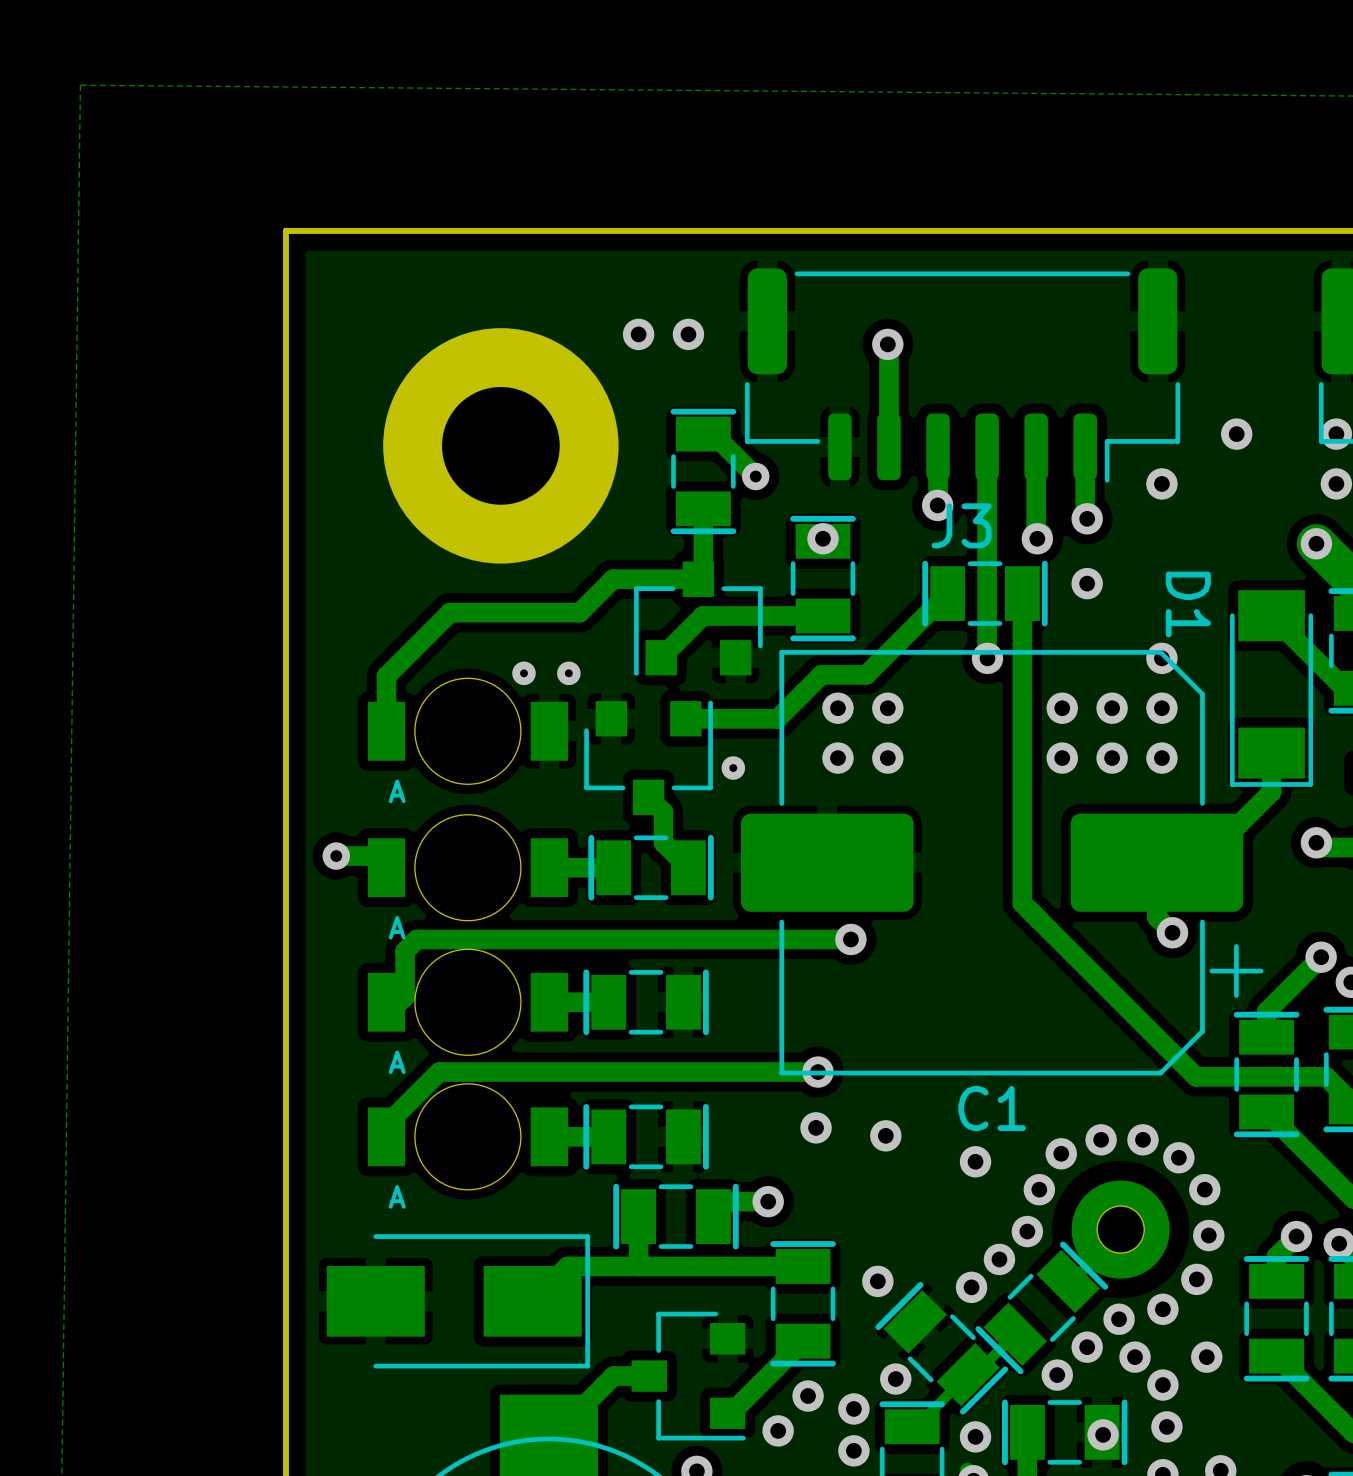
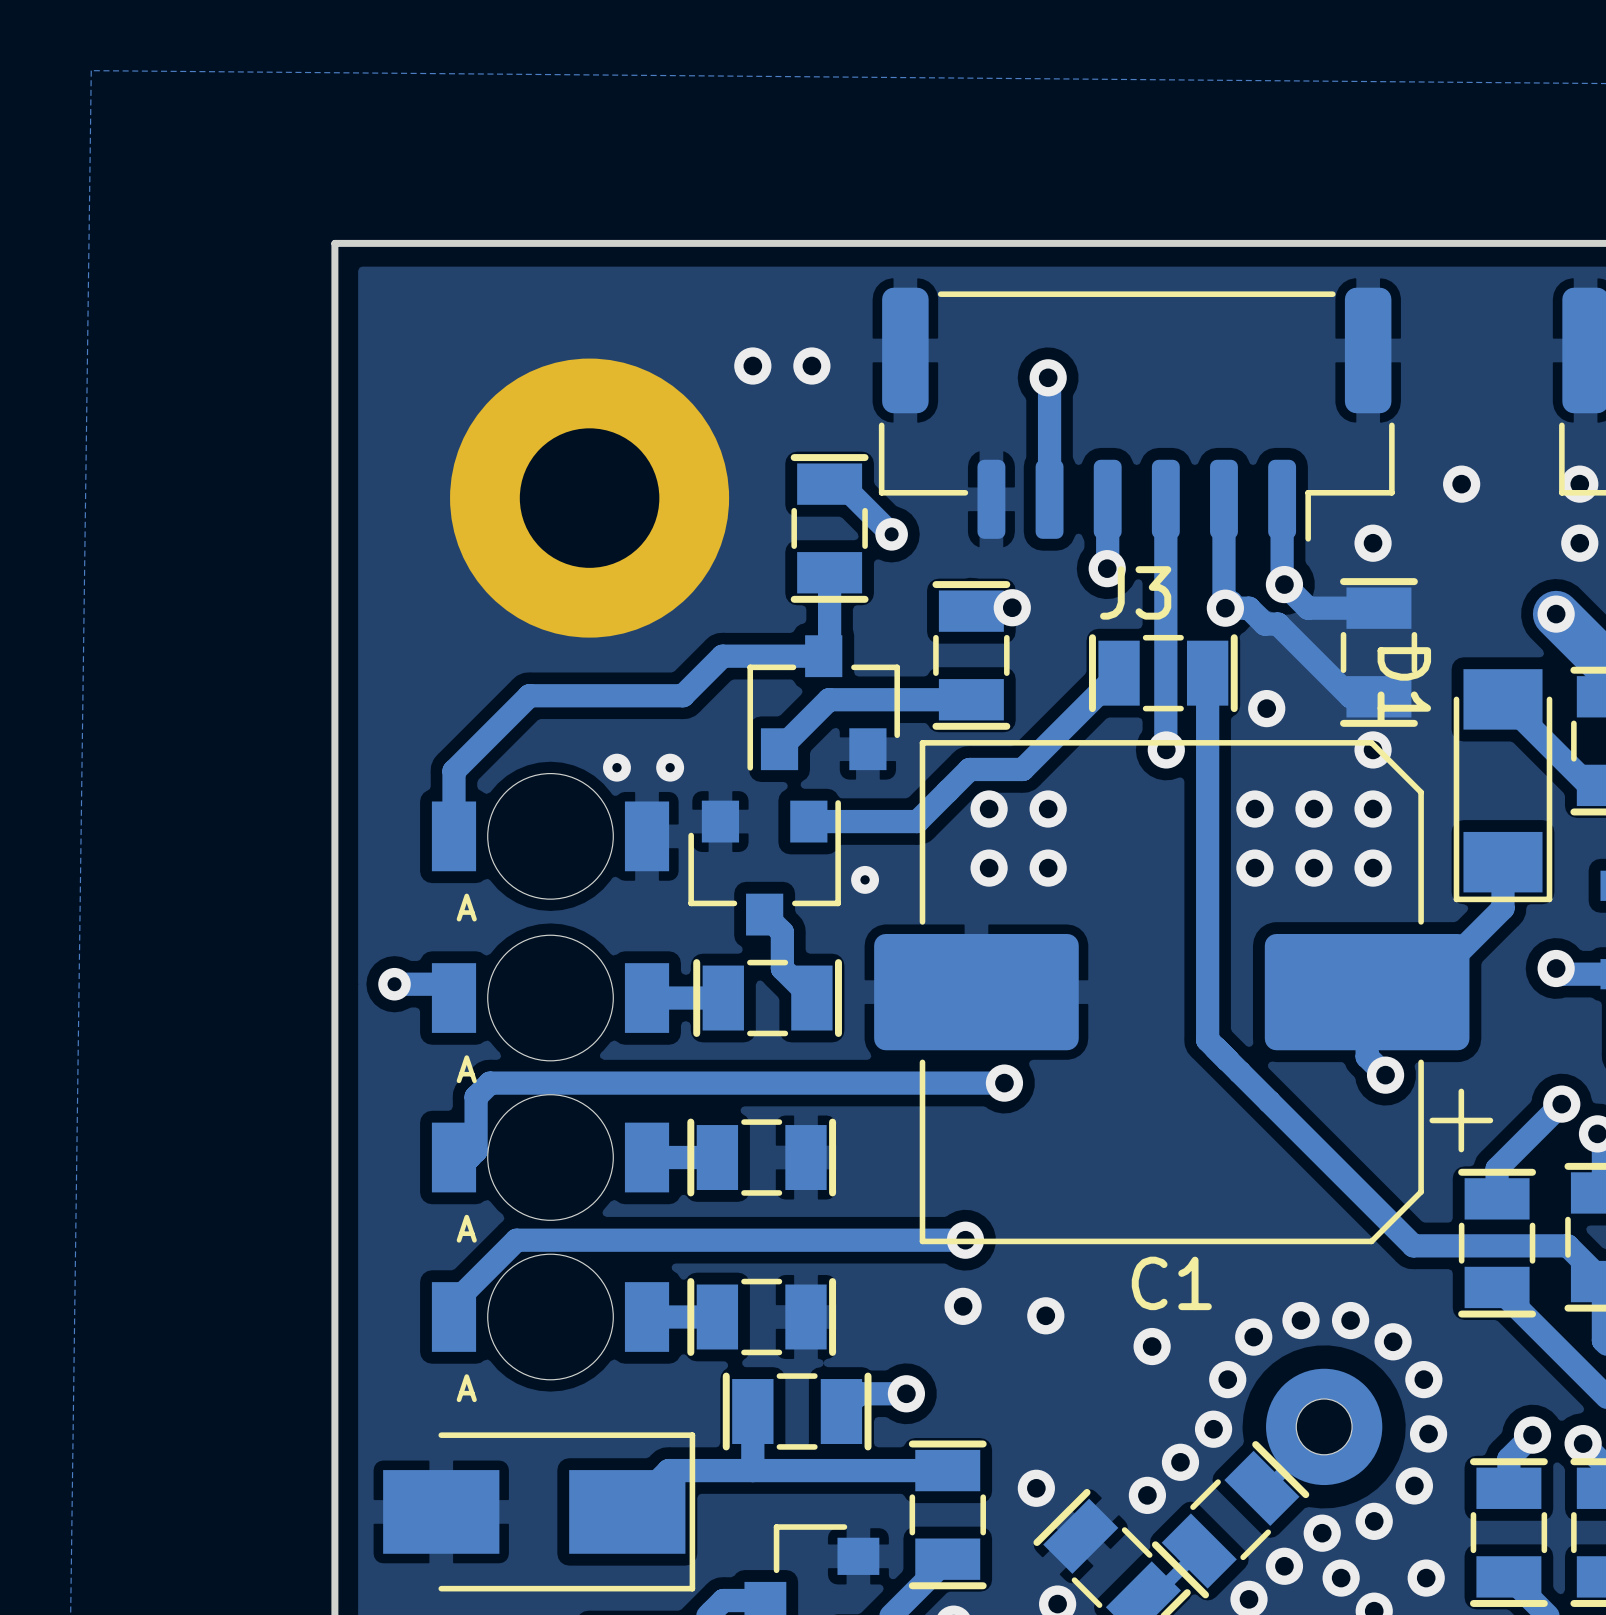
track: none -> (1284, 584) (1308, 608) (1378, 608)
via position: (823, 538) -> (1012, 607)
track: none -> (1225, 608) (1249, 608) (1264, 624) (1277, 624) (1350, 696) (1378, 696)
part: none -> (1378, 652)
via position: (1087, 583) -> (1266, 708)

